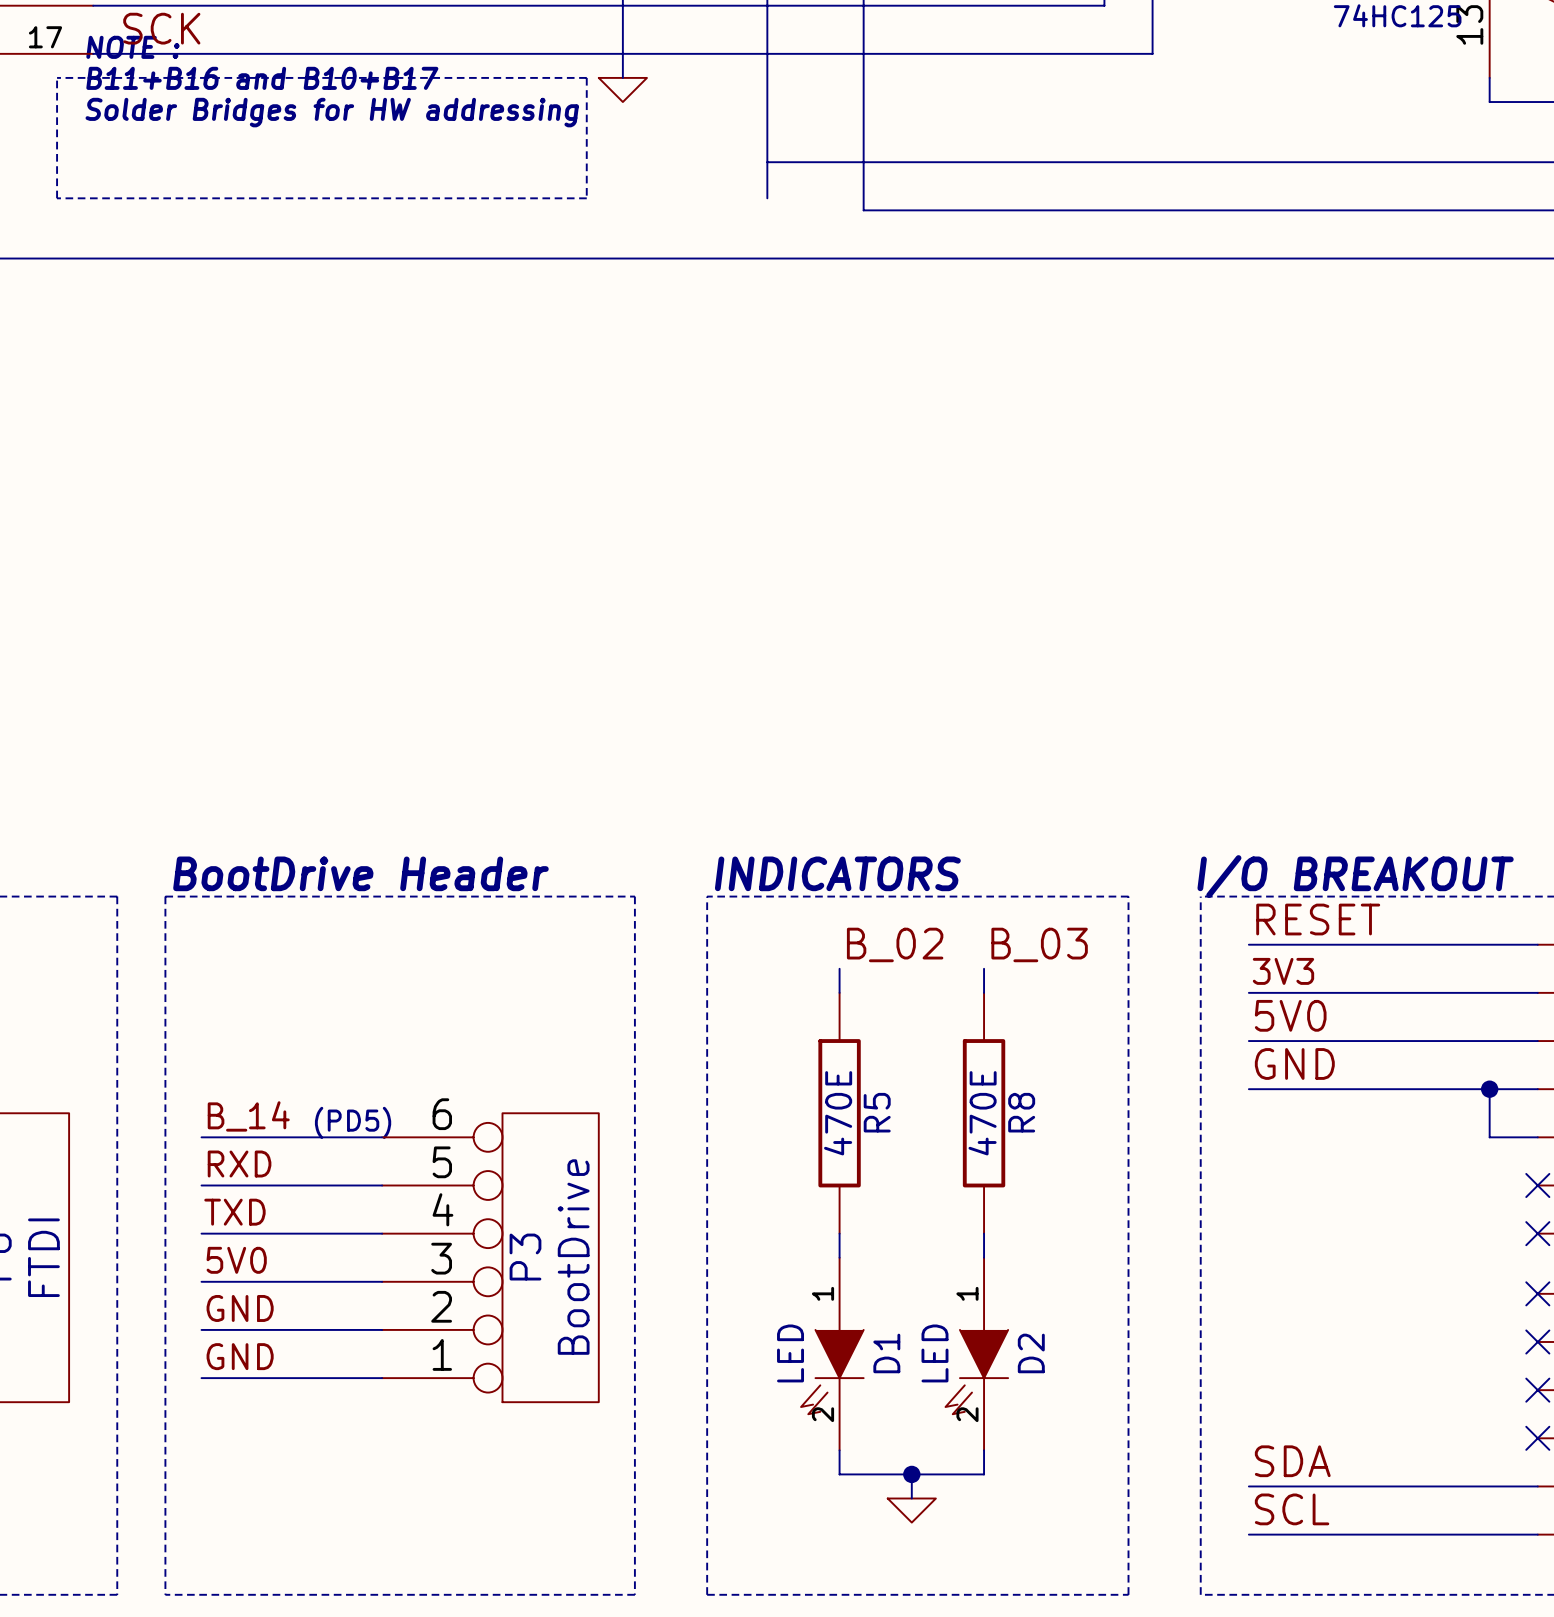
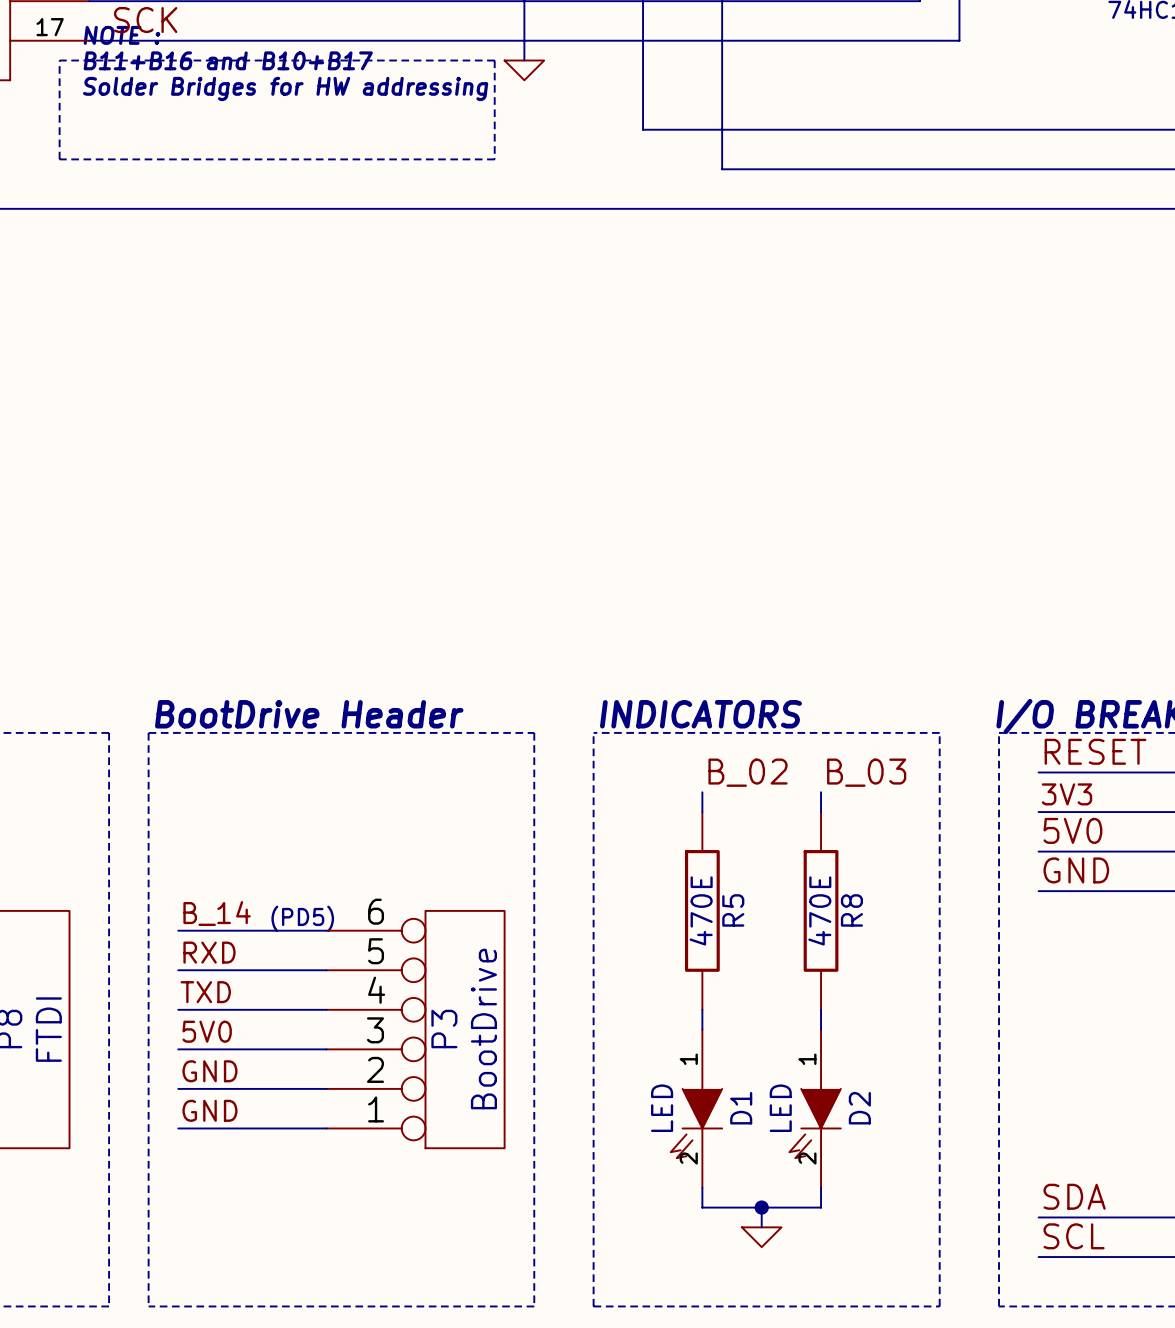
wire: (767, 162) (767, 198) -> none

